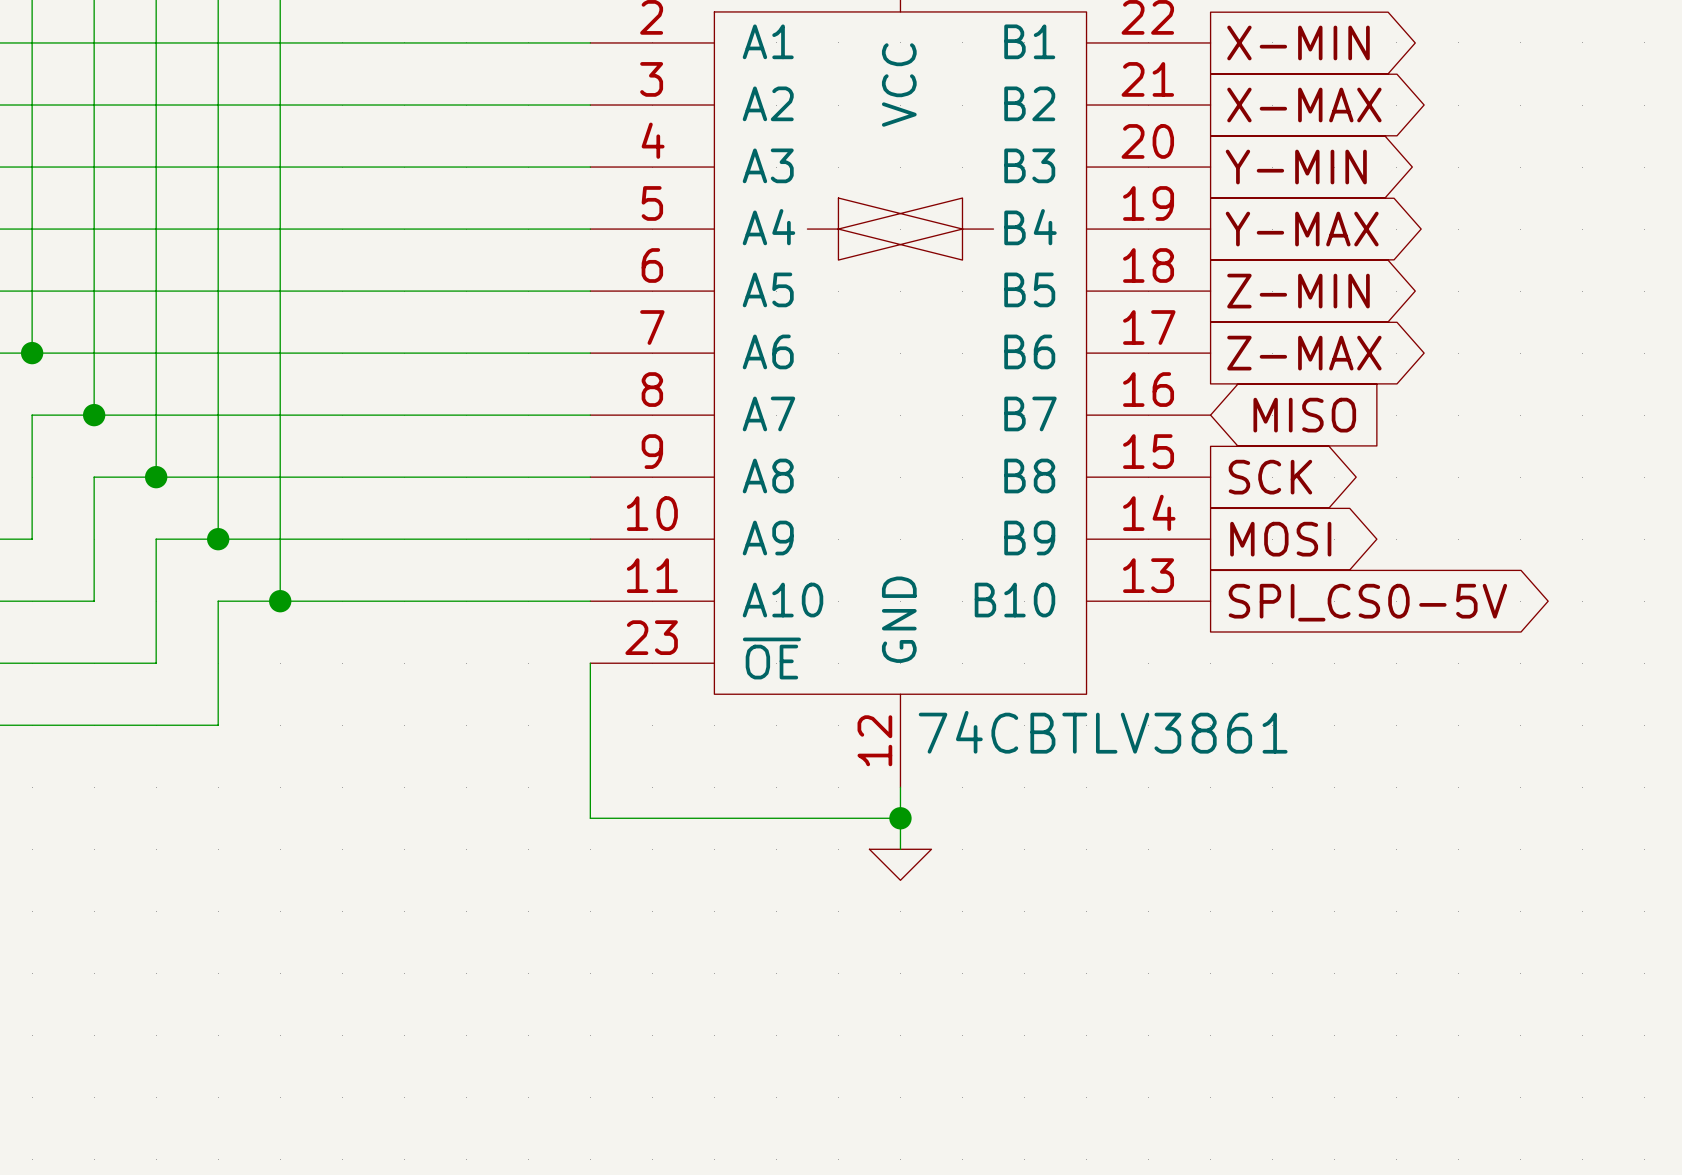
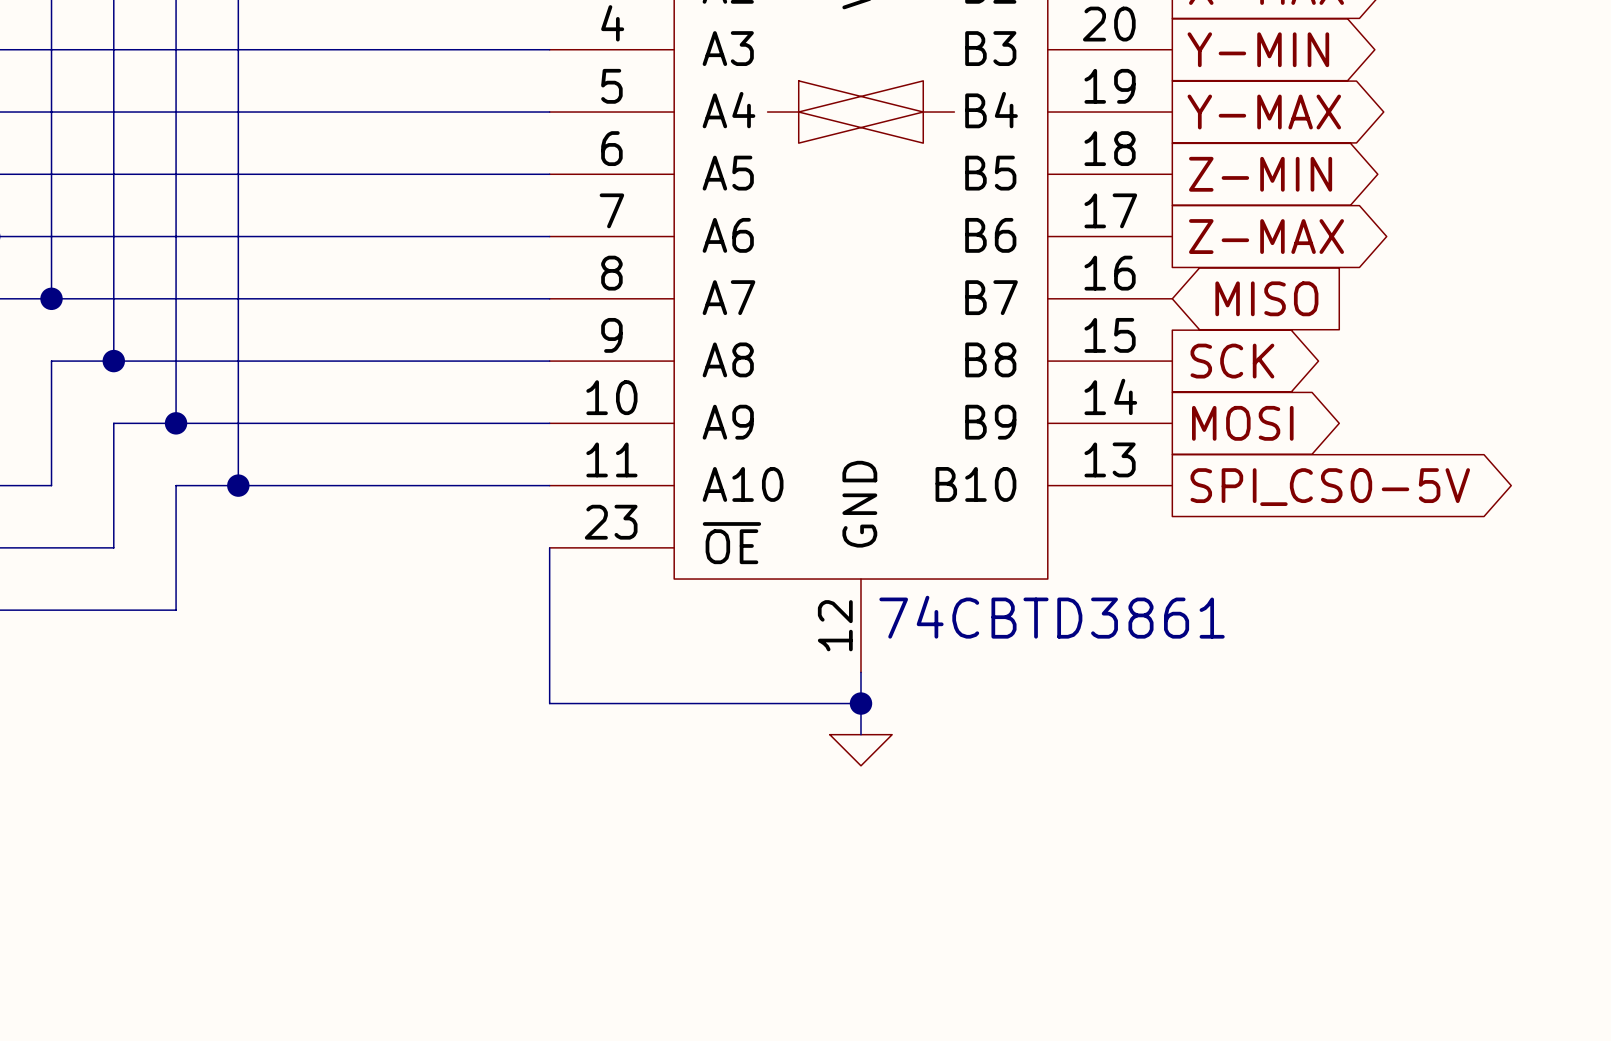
part value: 74CBTLV3861 (1103, 732) -> 74CBTD3861 (1052, 617)

